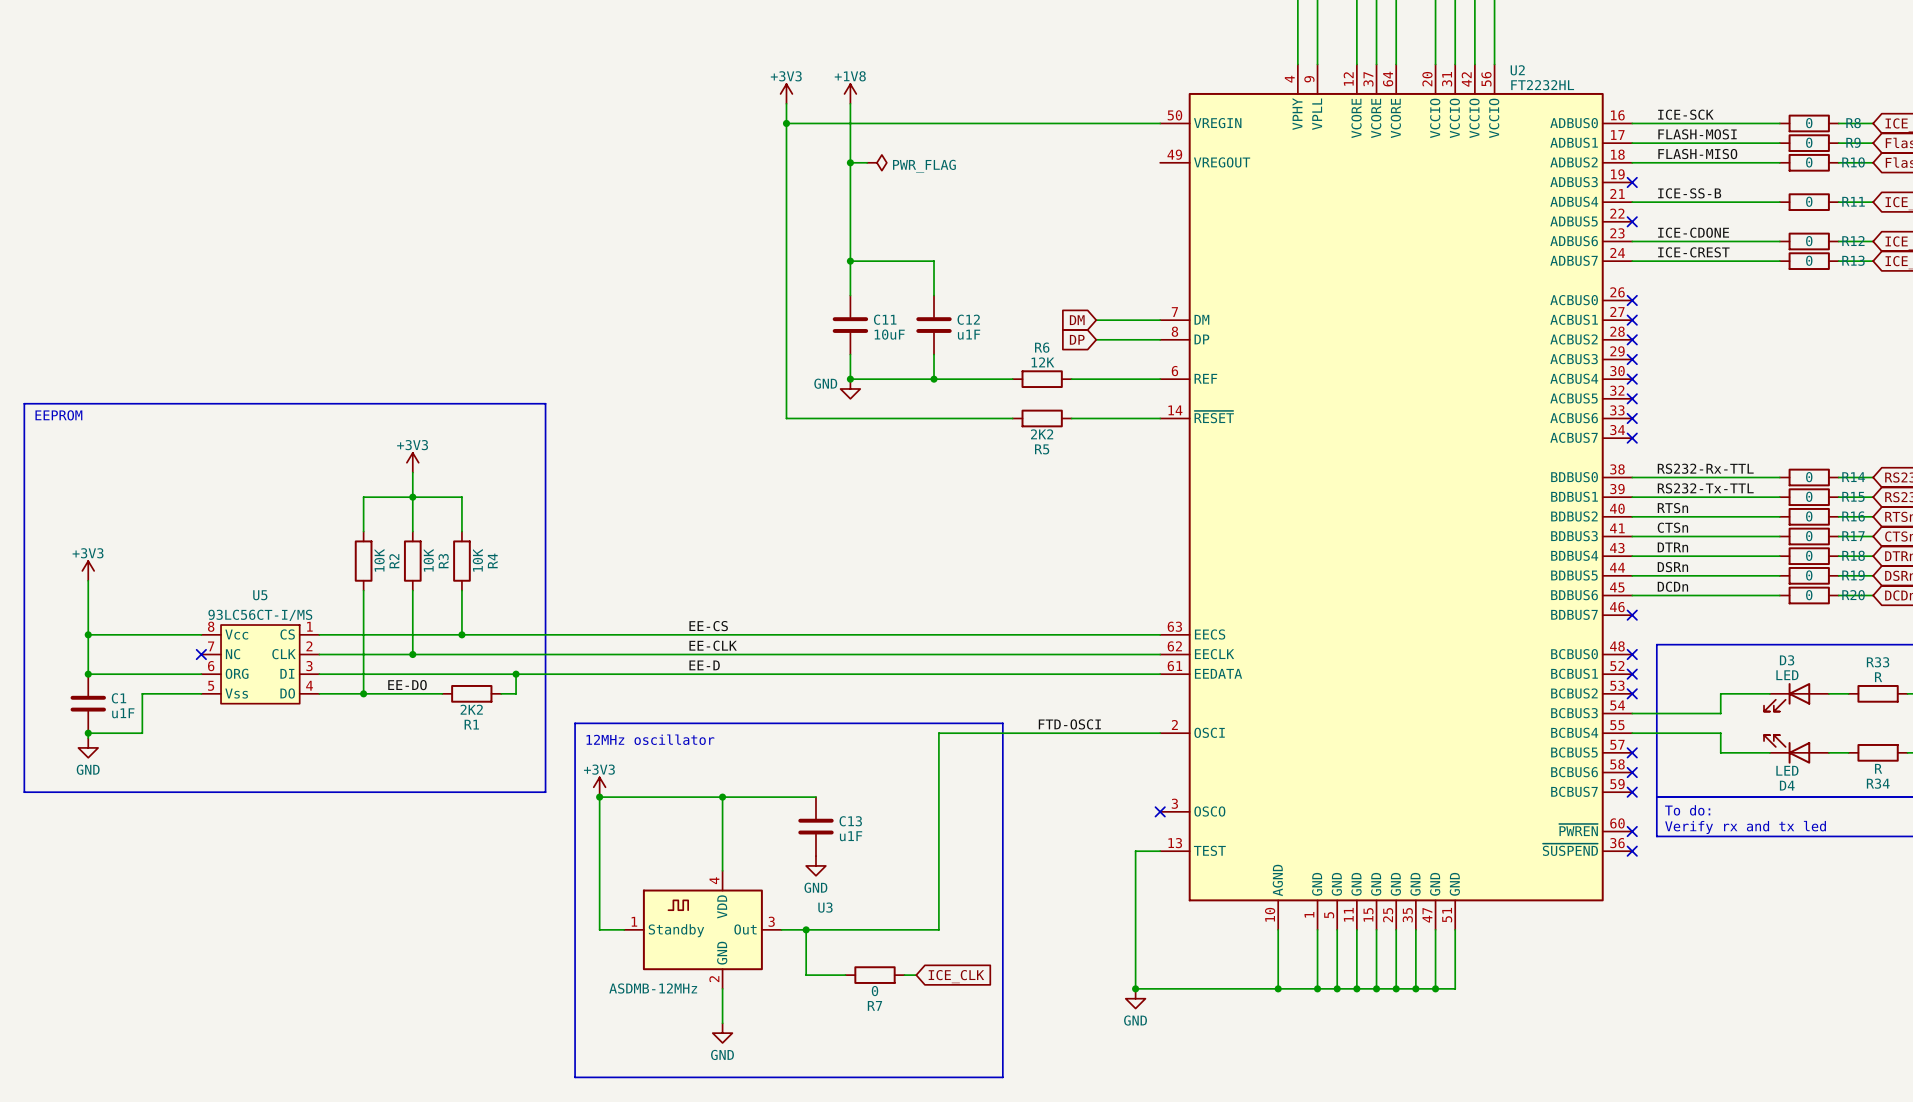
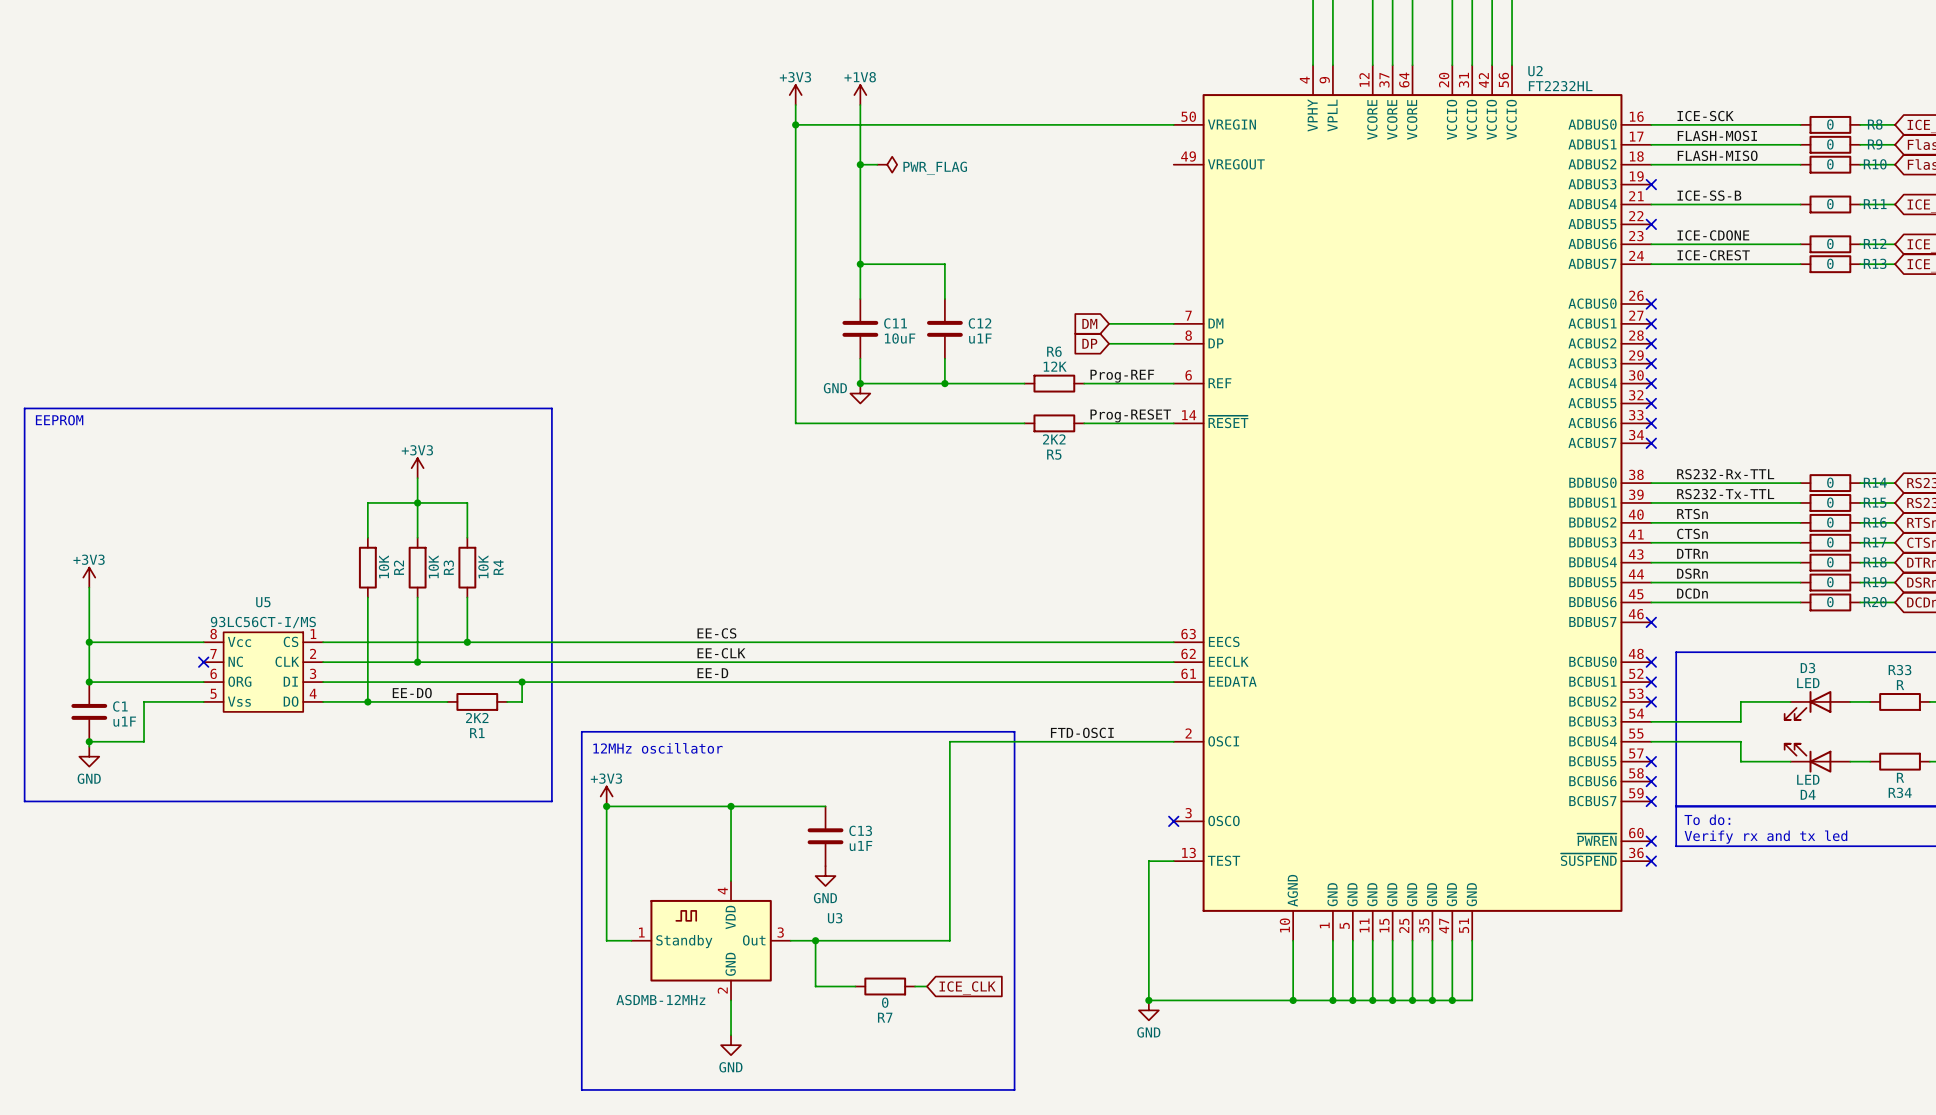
label: none -> Prog-REF (1122, 376)
label: none -> Prog-RESET (1130, 415)

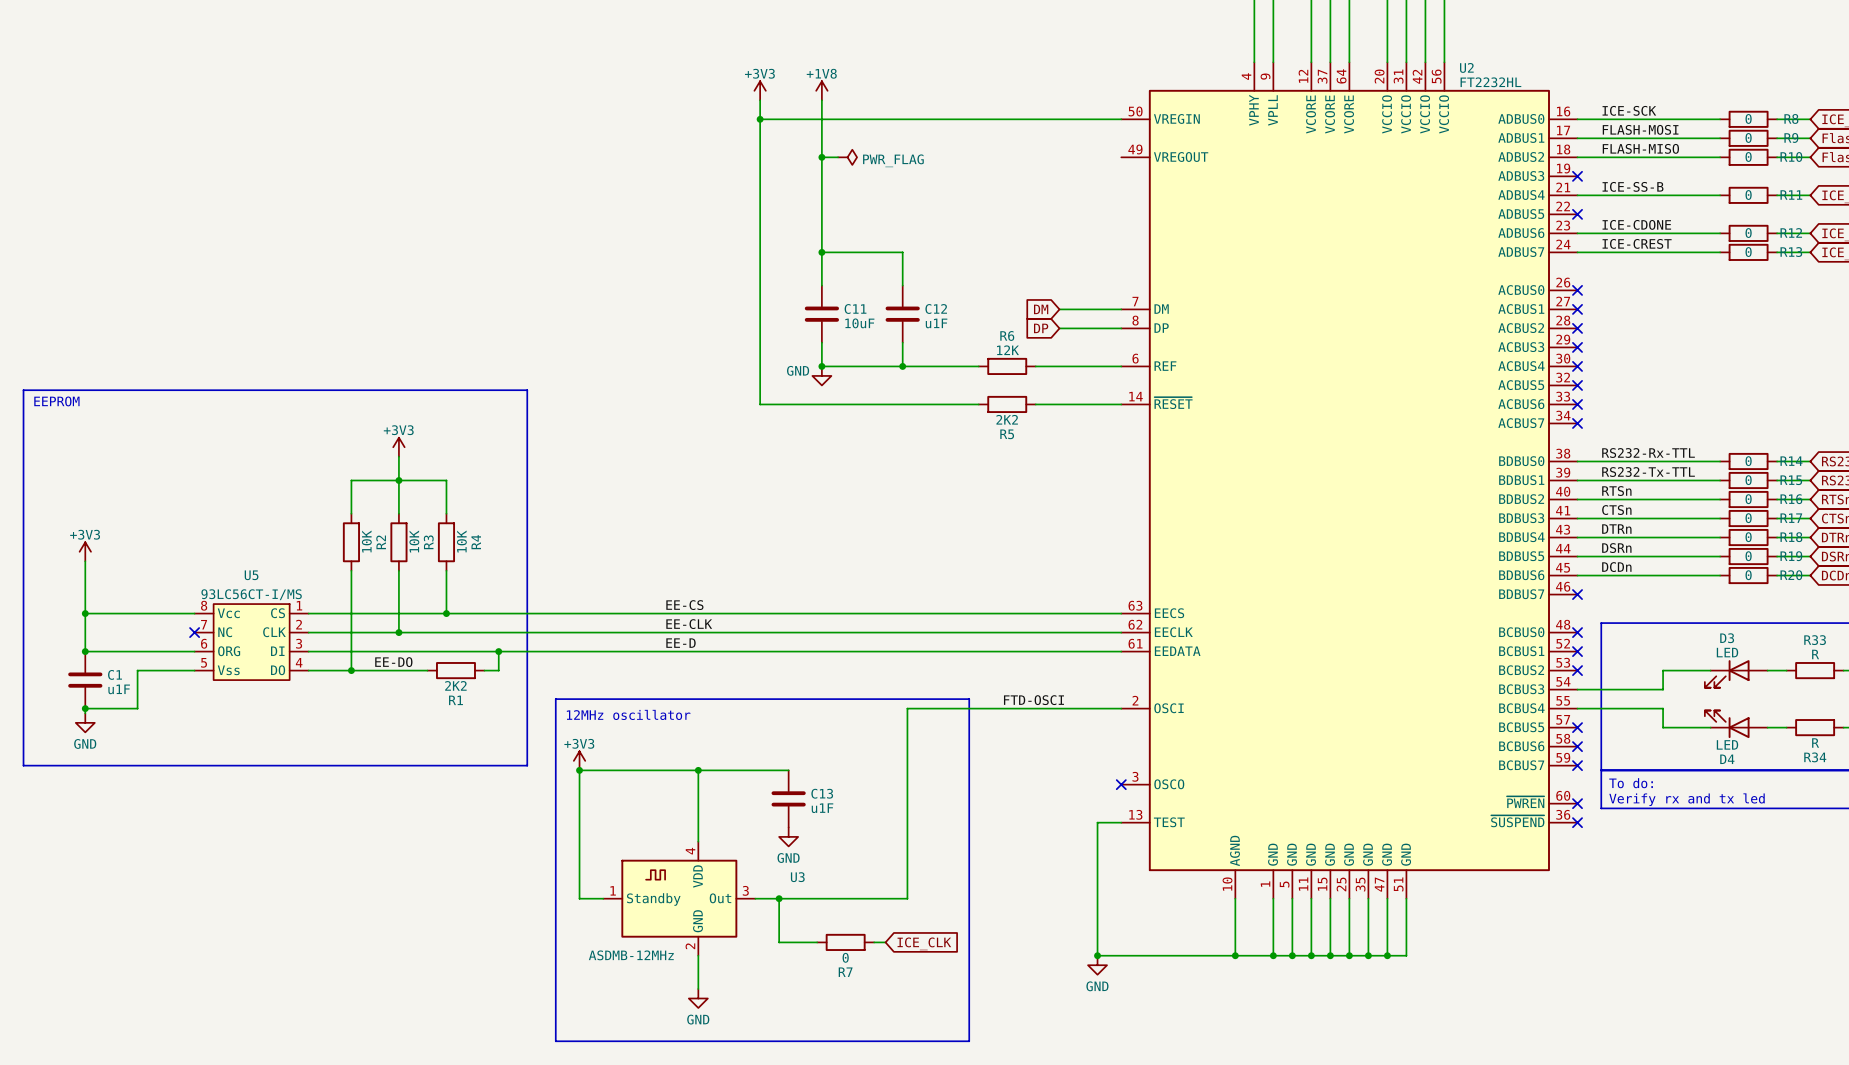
label: Prog-REF (1122, 376) -> none
label: Prog-RESET (1130, 415) -> none

